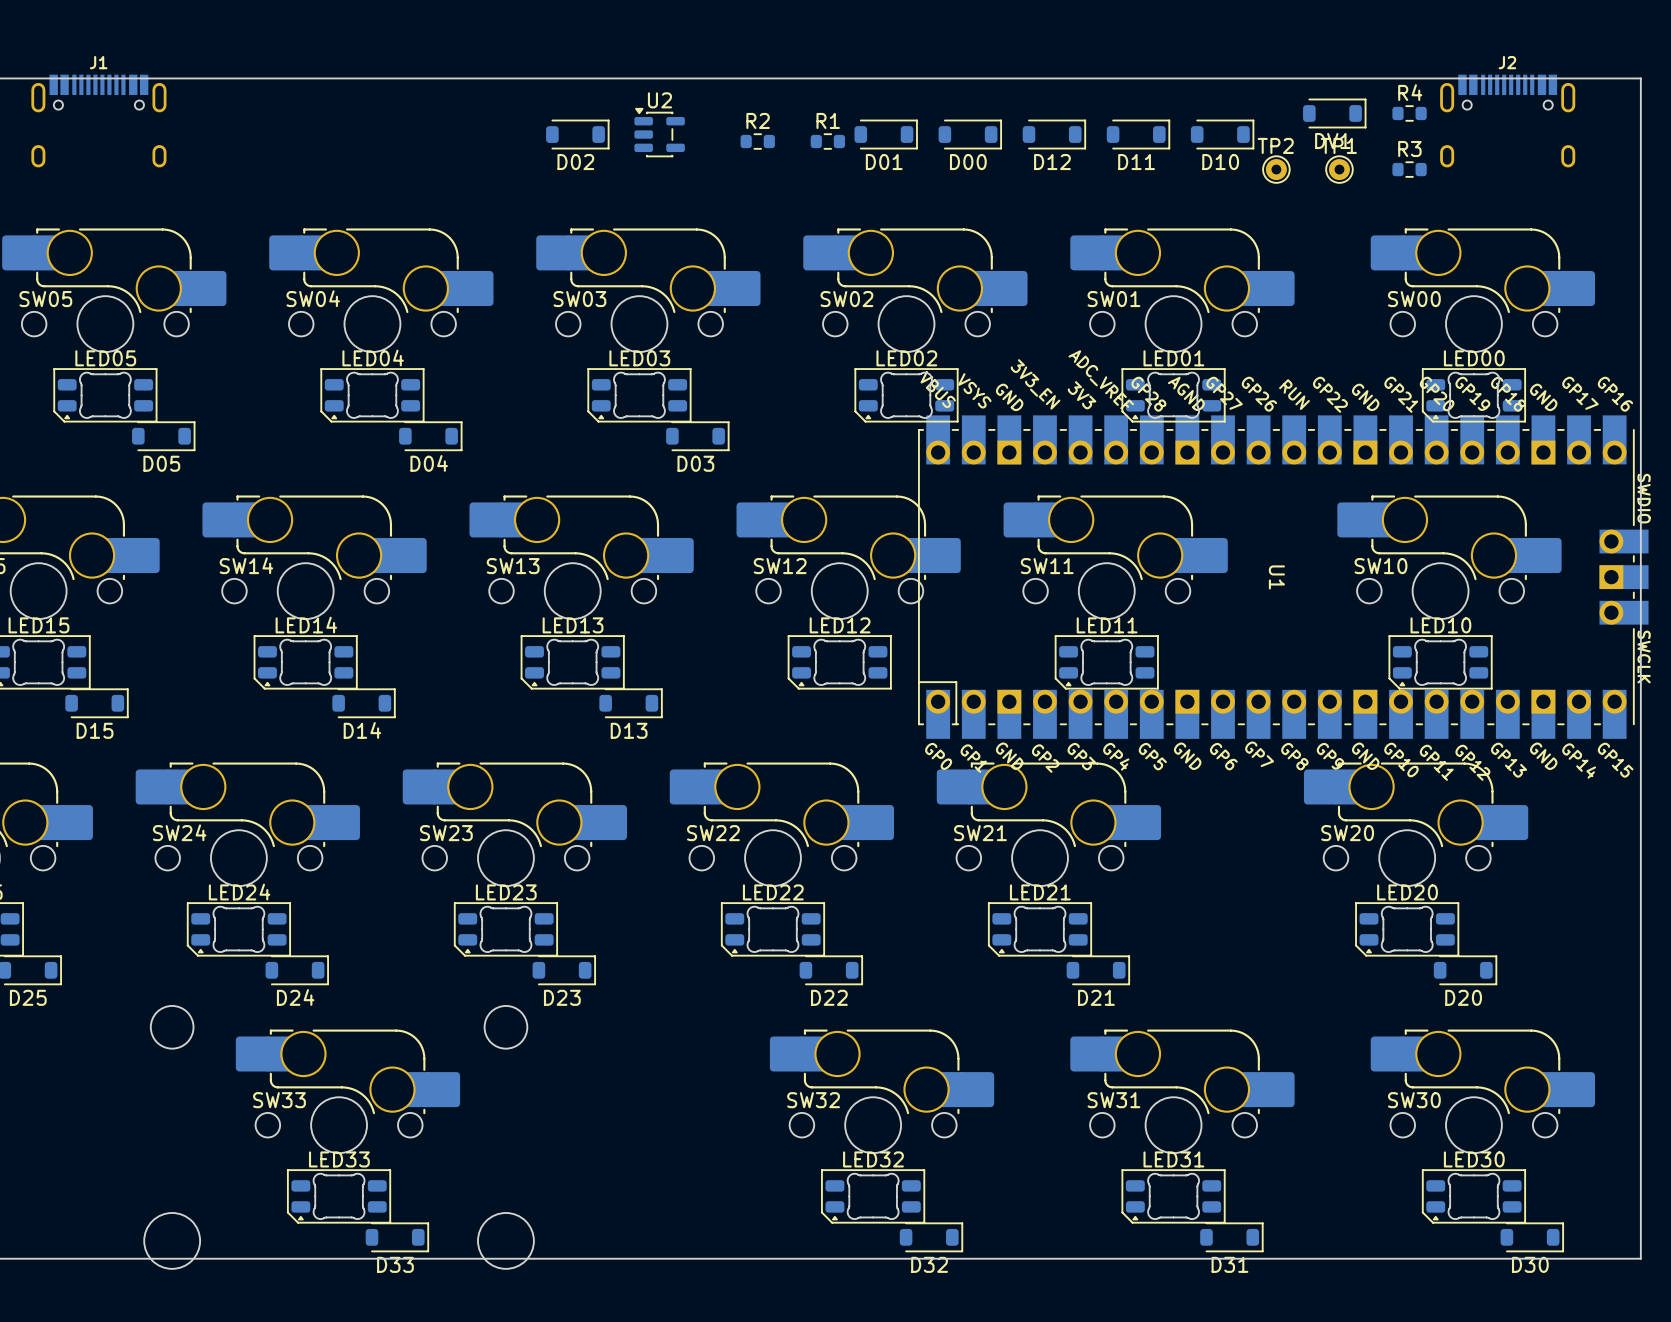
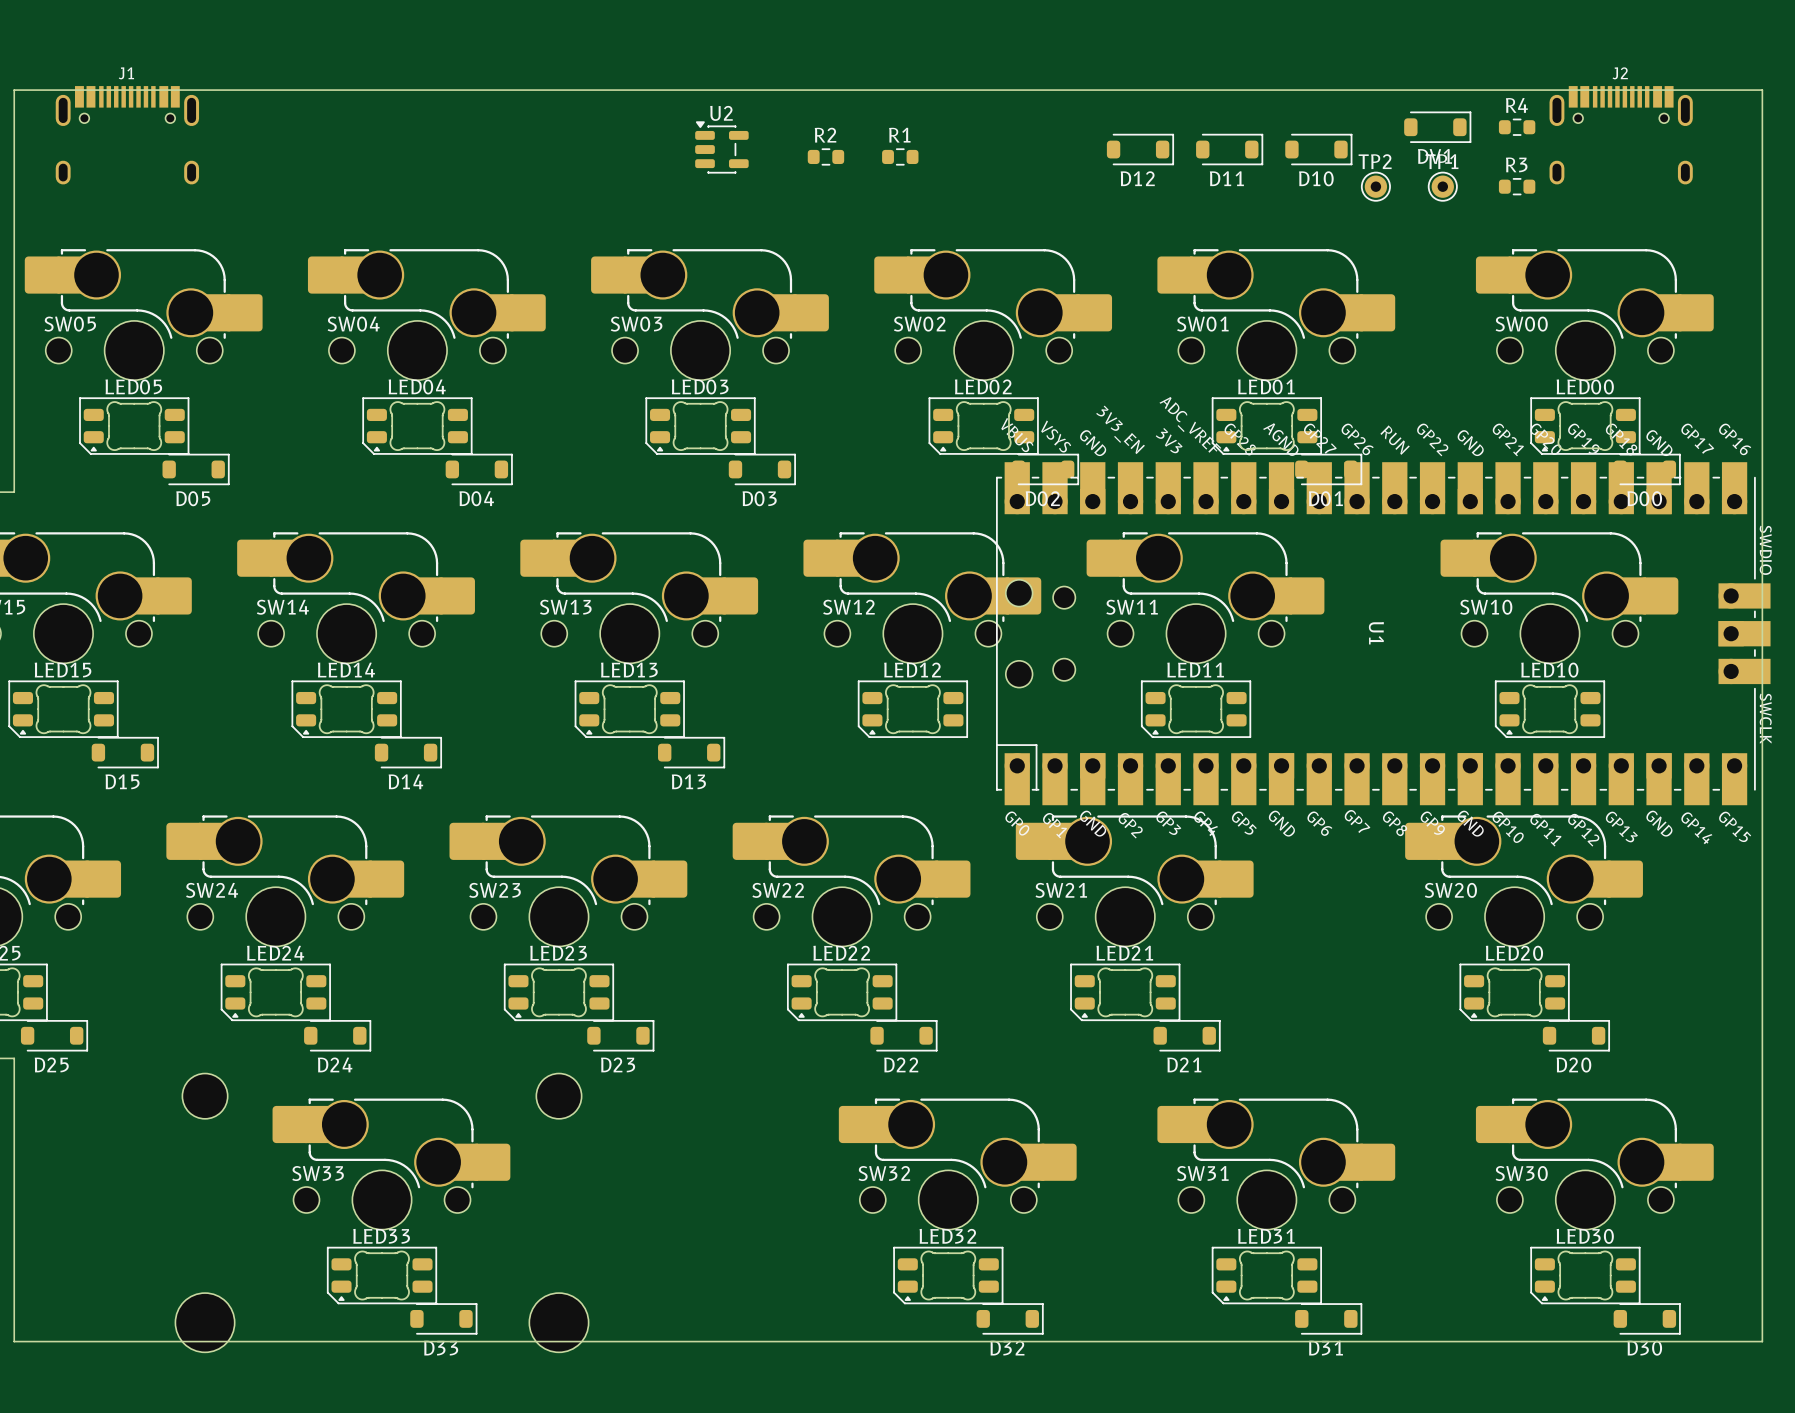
D02 position: (577, 134) -> (1045, 469)
D01 position: (886, 134) -> (1328, 469)
D00 position: (970, 134) -> (1647, 469)
U1 footprint: [918, 415, 1649, 739] -> [996, 462, 1771, 806]

